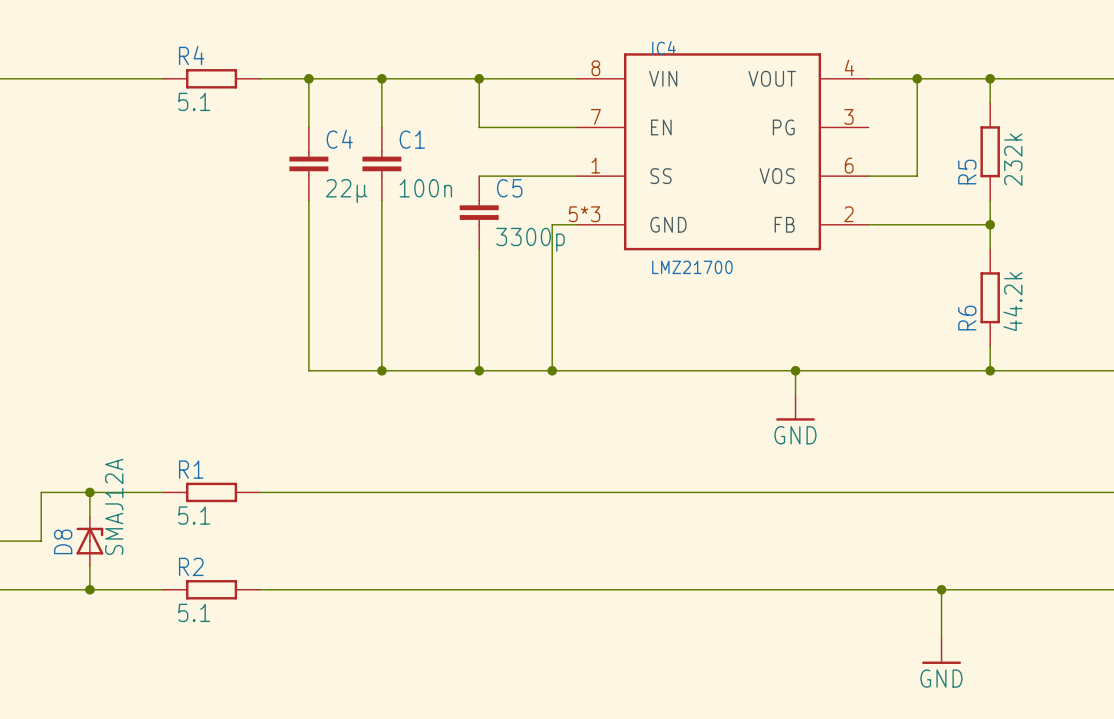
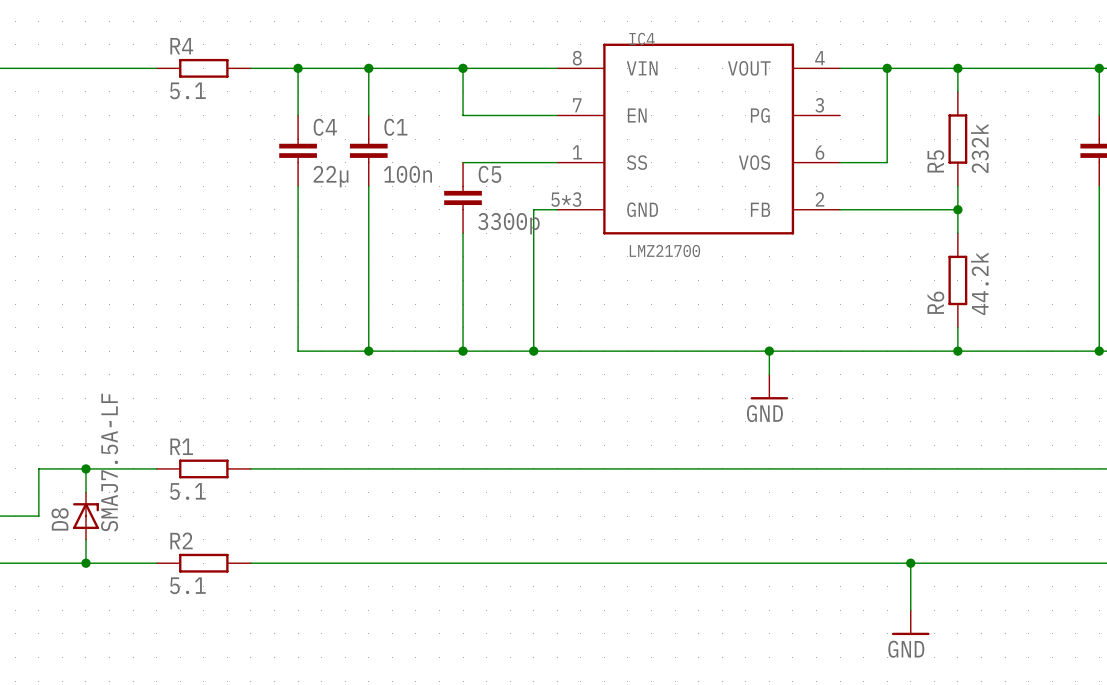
D8 value: SMAJ12A (114, 506) -> SMAJ7.5A-LF (109, 462)

